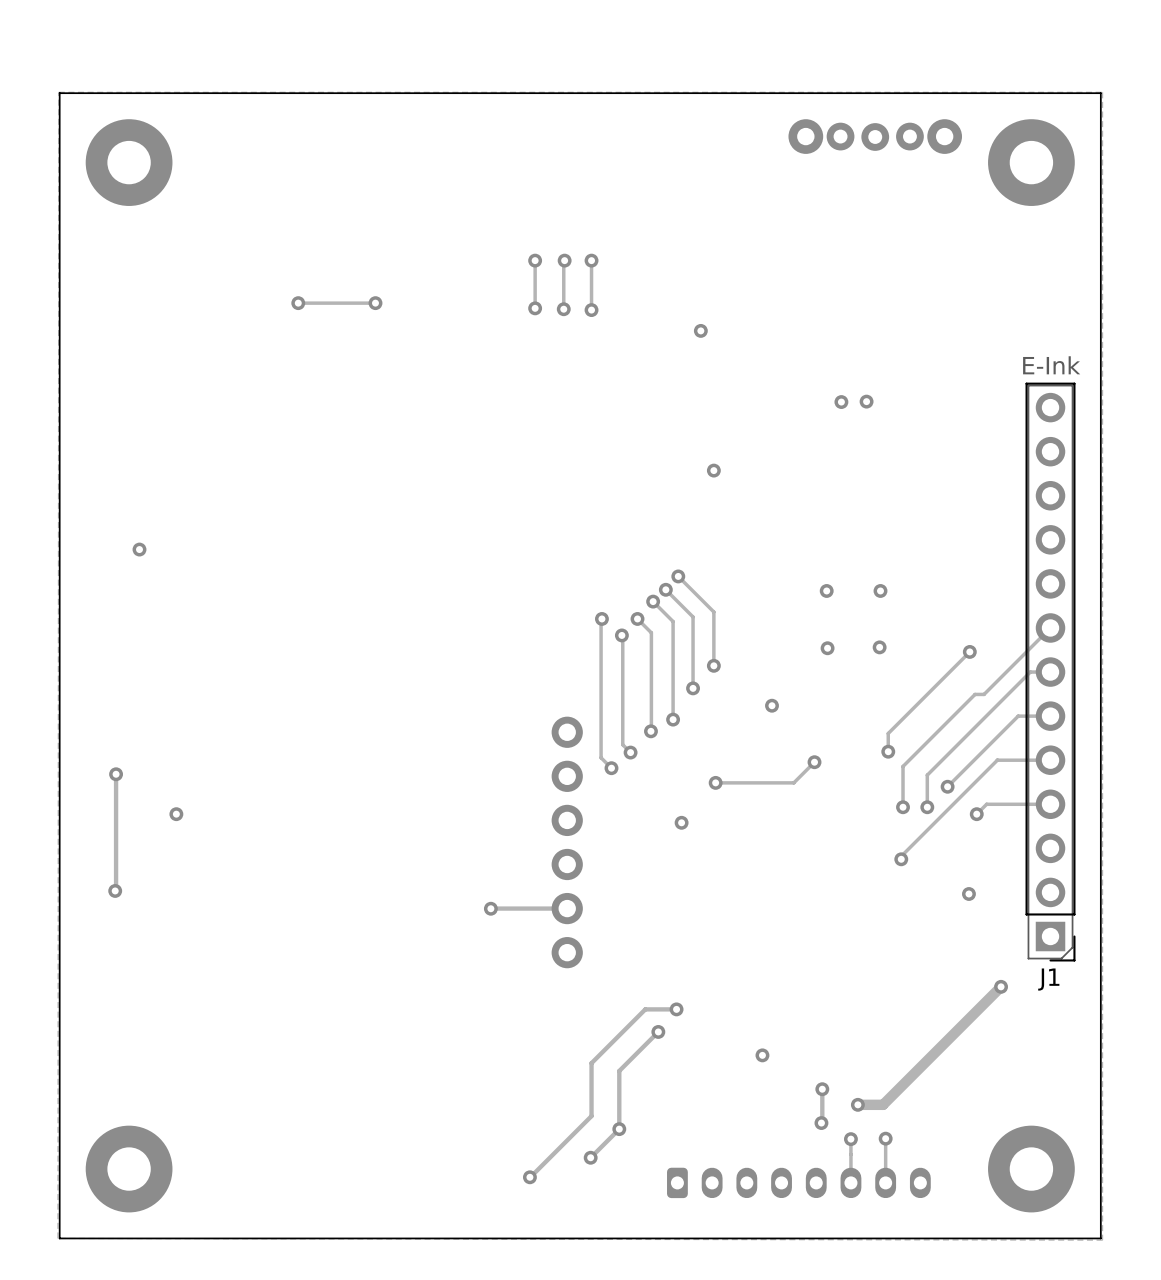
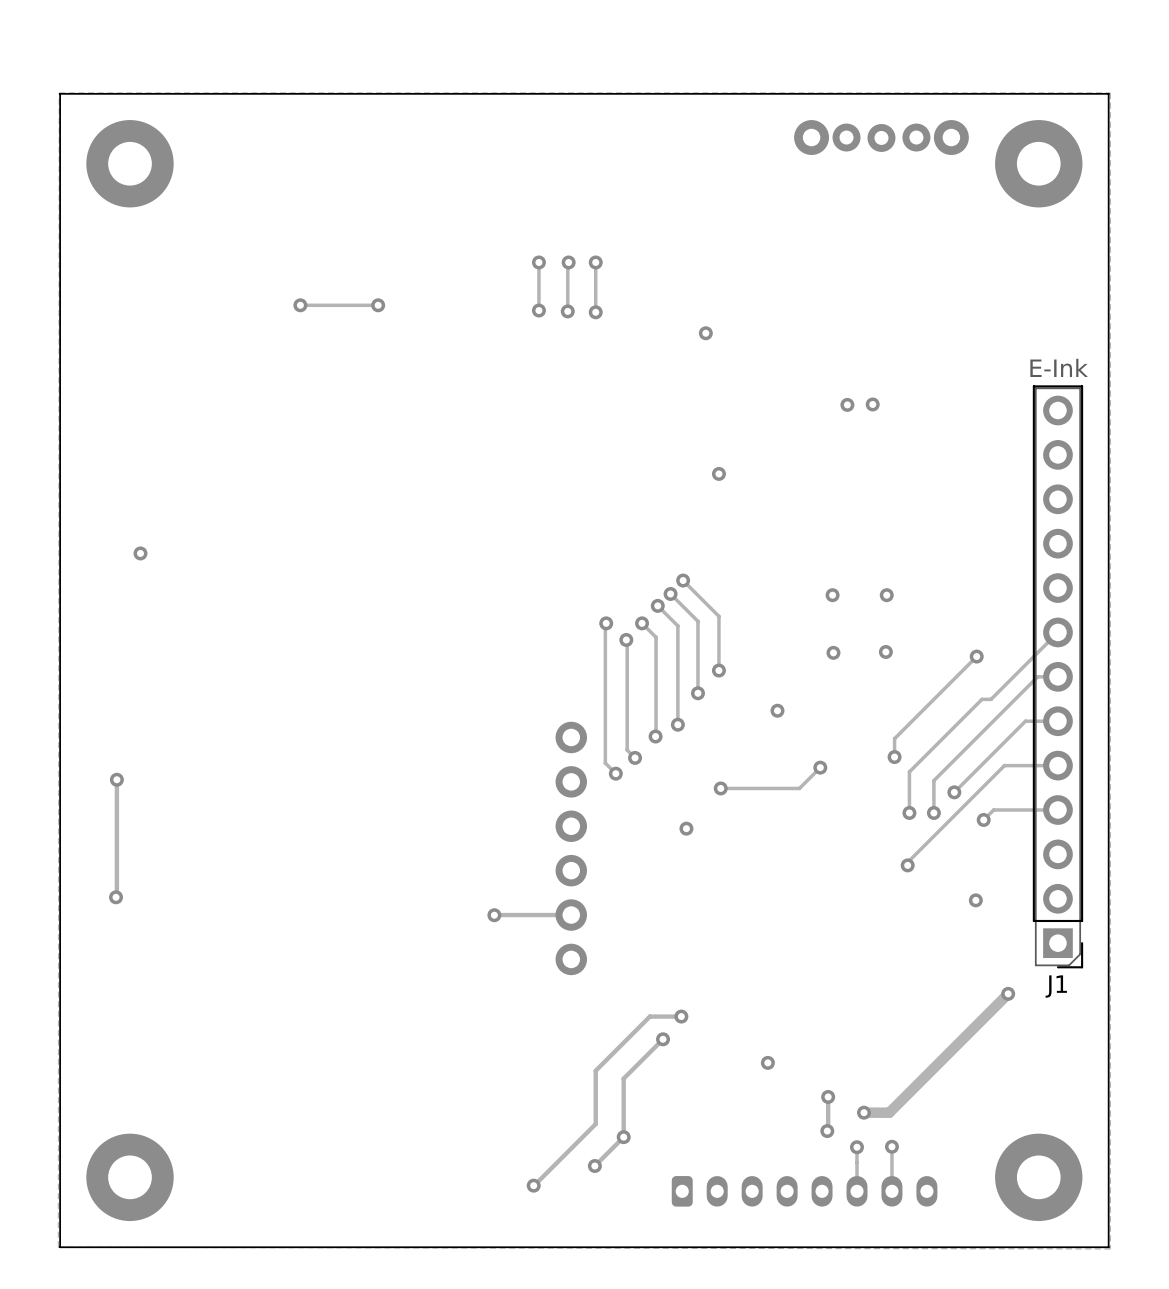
via: (176, 814) -> none

